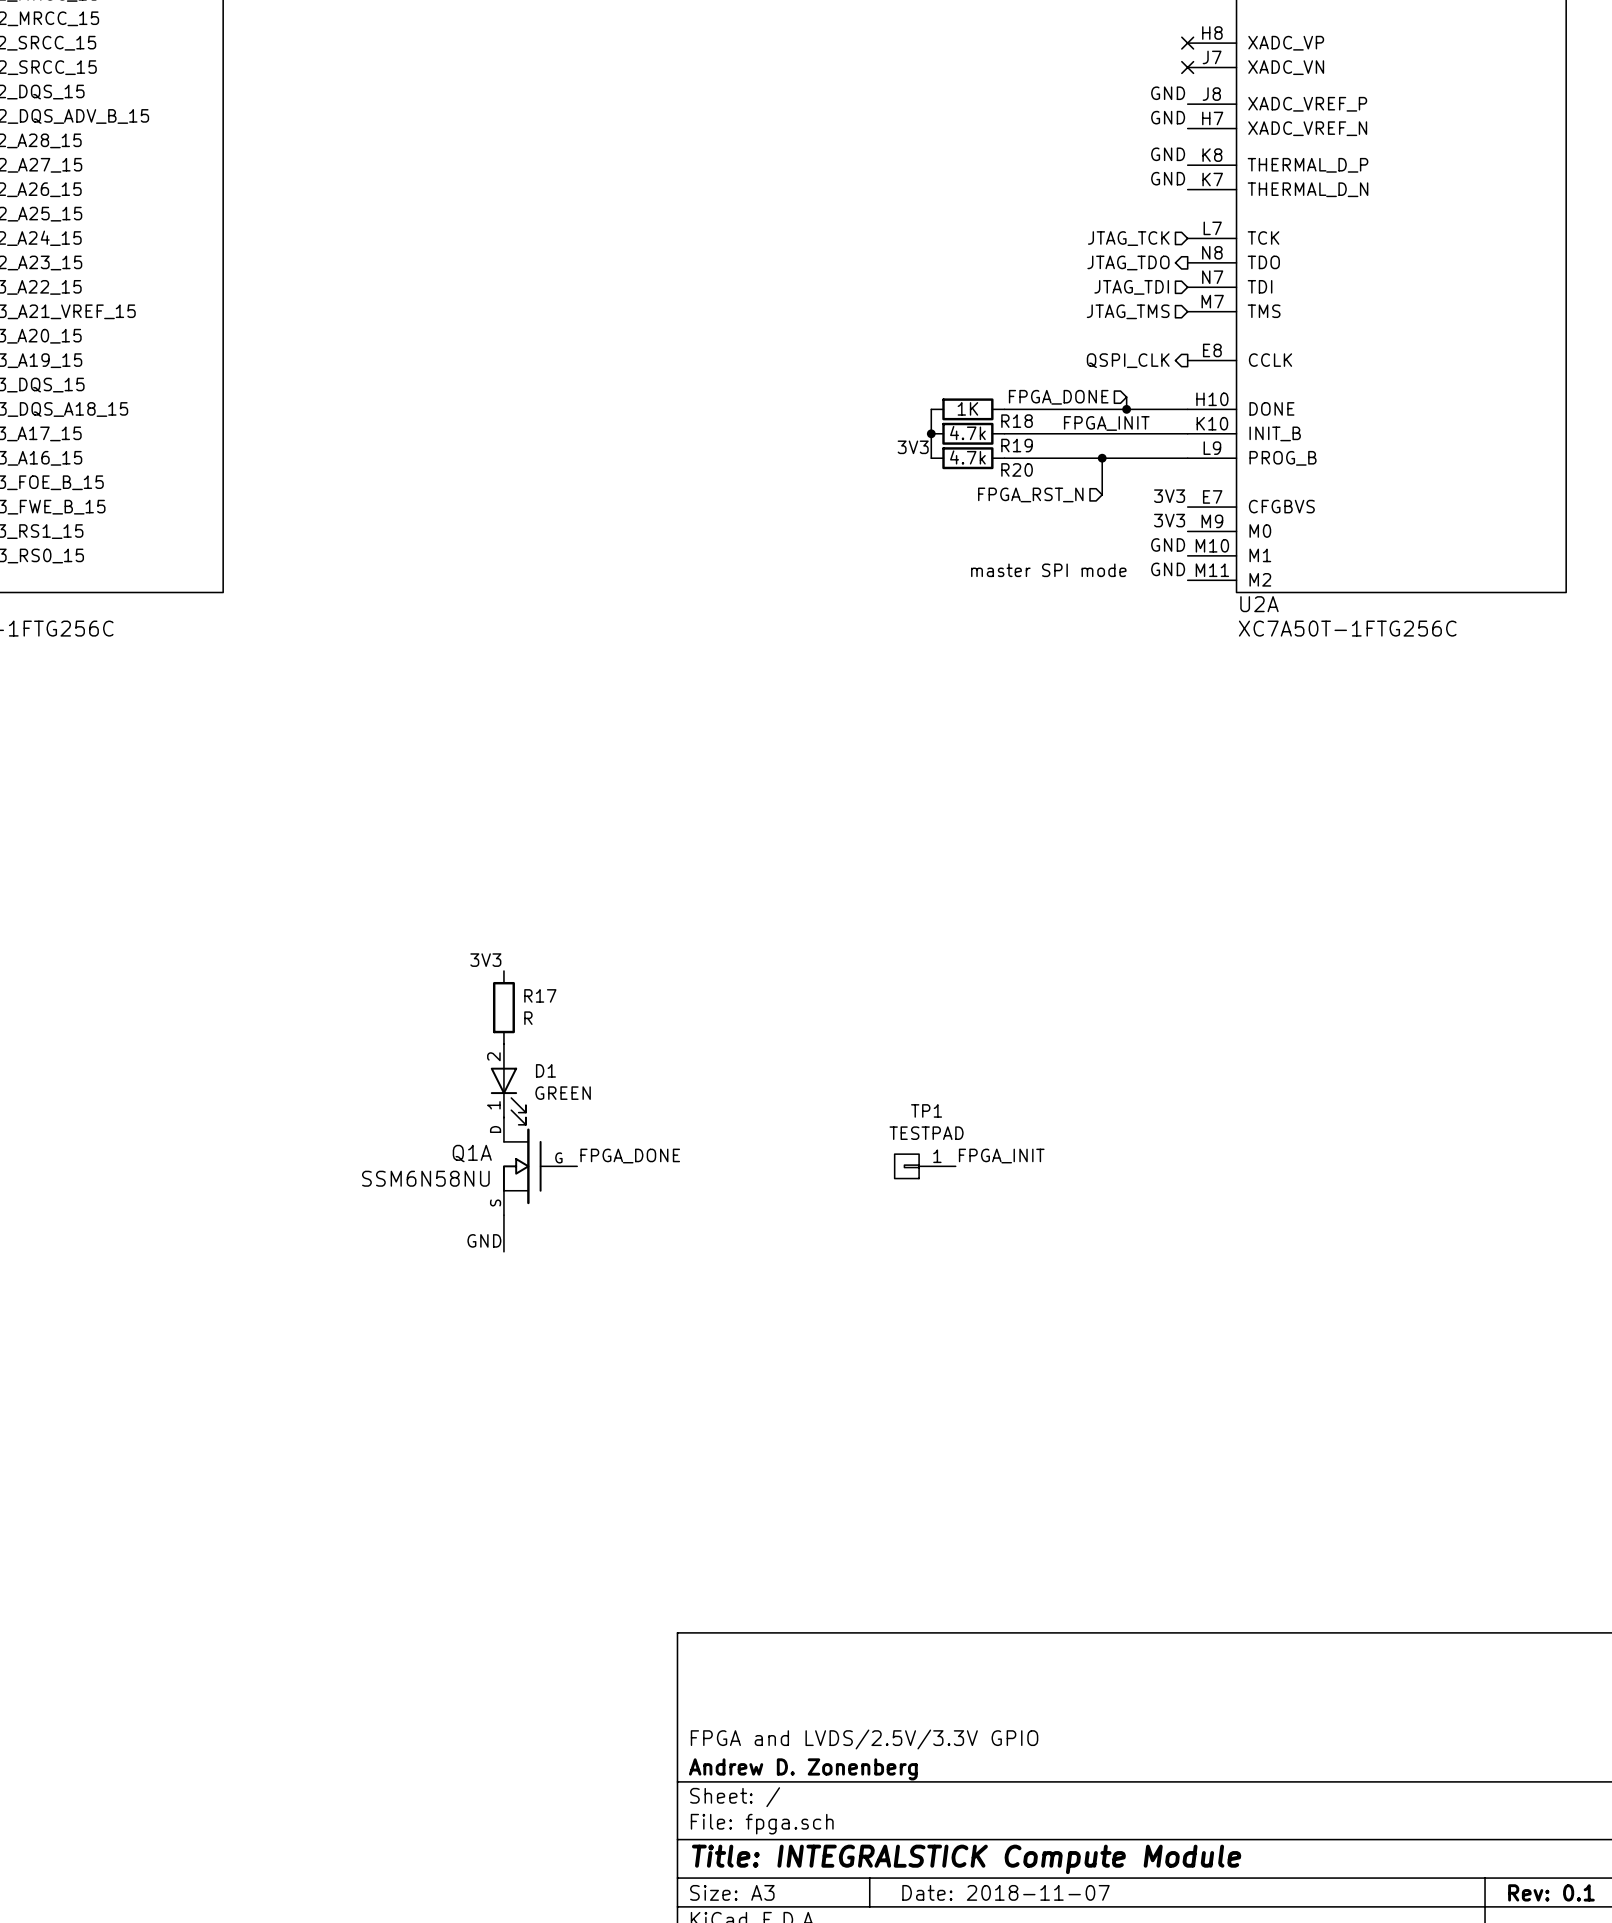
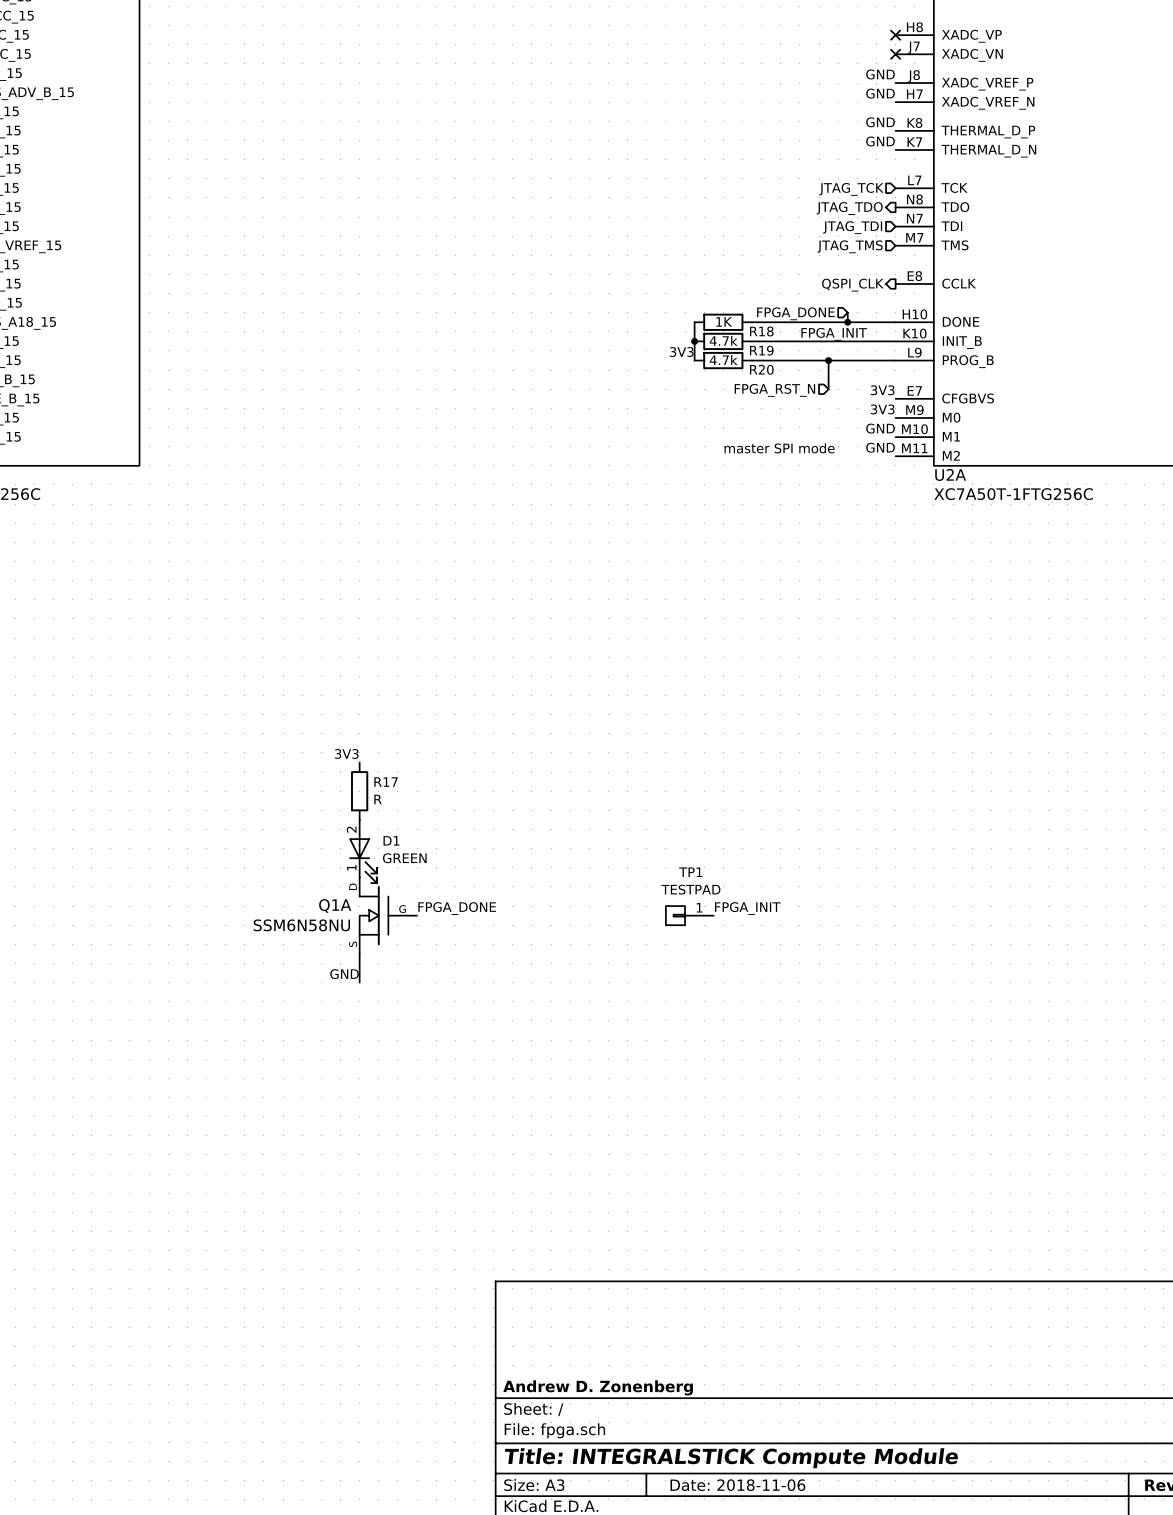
title block: FPGA and LVDS/2.5V/3.3V GPIO (864, 1739) -> none
title block: Date: 2018-11-07 (1005, 1892) -> Date: 2018-11-06 (737, 1485)

